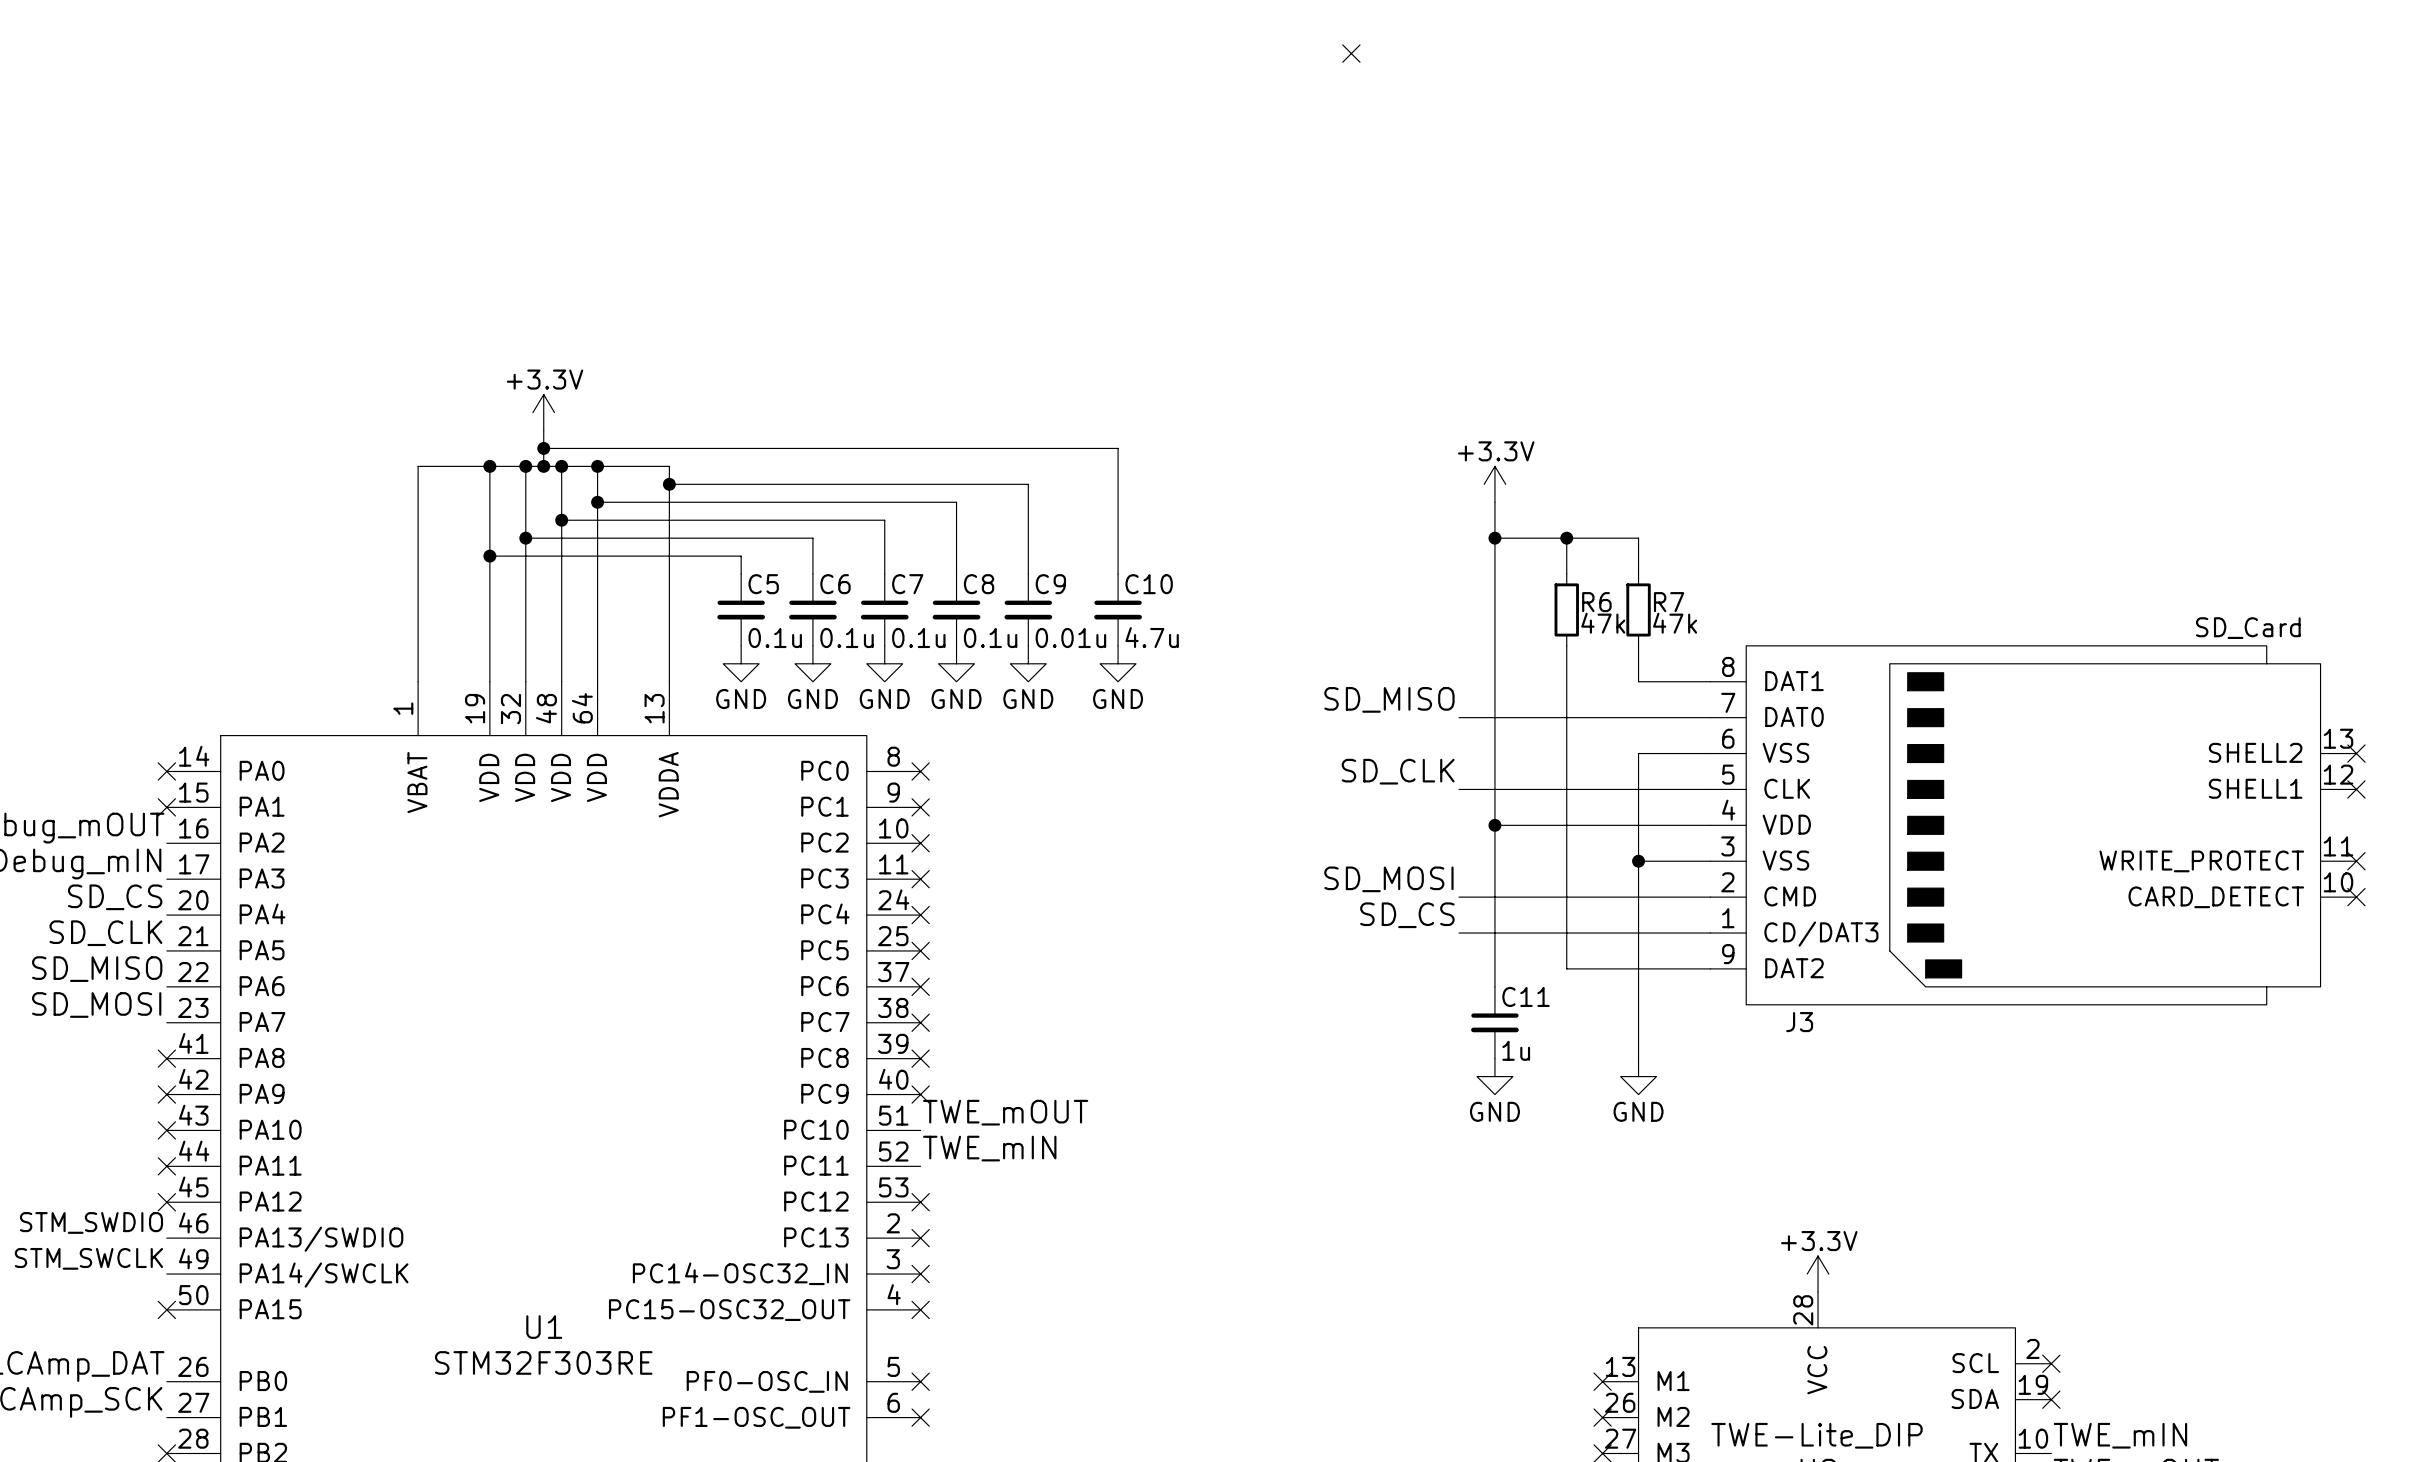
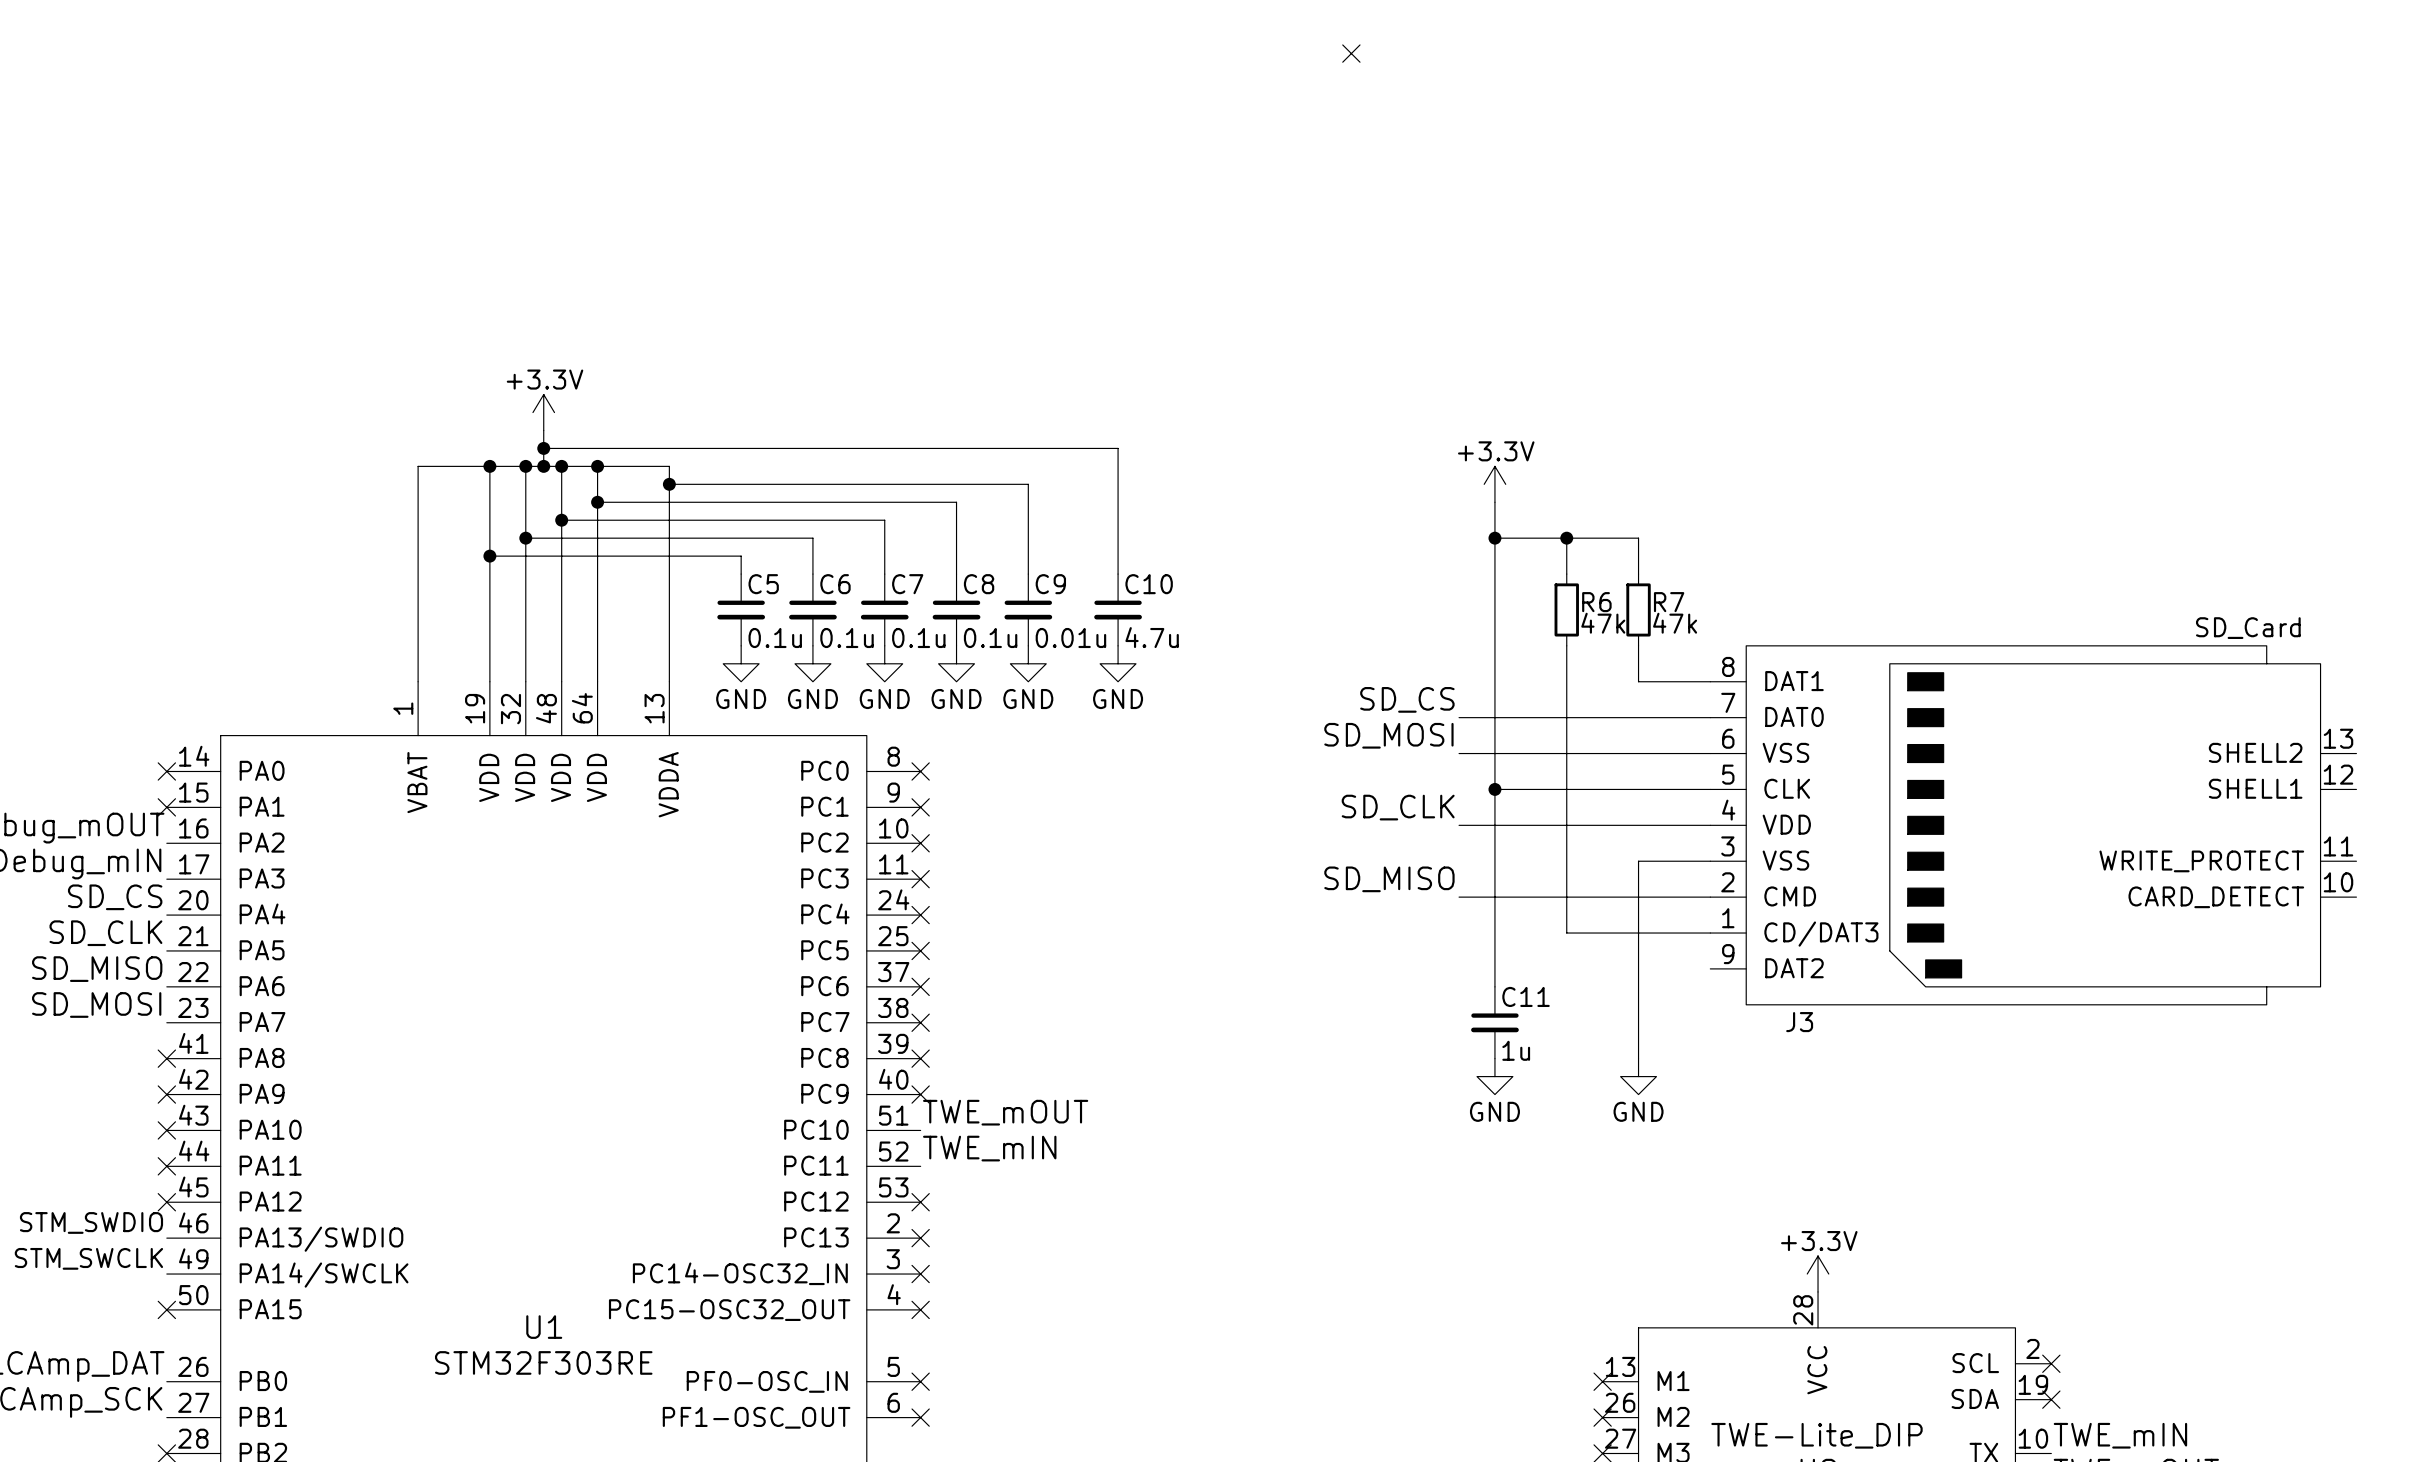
label: SD_MISO (1389, 699) -> SD_CS (1407, 699)
label: none -> SD_MOSI (1388, 735)
wire: (1638, 753) (1638, 861) -> (1638, 753) (1459, 753)
no-connect mark: (2356, 753) -> none
label position: SD_CLK (1398, 771) -> SD_CLK (1398, 807)
wire: (1459, 789) (1494, 789) -> (1459, 825) (1494, 825)
no-connect mark: (2356, 789) -> none
junction position: (1494, 825) -> (1494, 789)
junction: (1638, 861) -> none
no-connect mark: (2356, 861) -> none
label: SD_MOSI (1388, 879) -> SD_MISO (1389, 879)
no-connect mark: (2356, 897) -> none
label: SD_CS (1407, 915) -> none
wire: (1459, 933) (1566, 933) (1566, 968) (1710, 968) -> none

